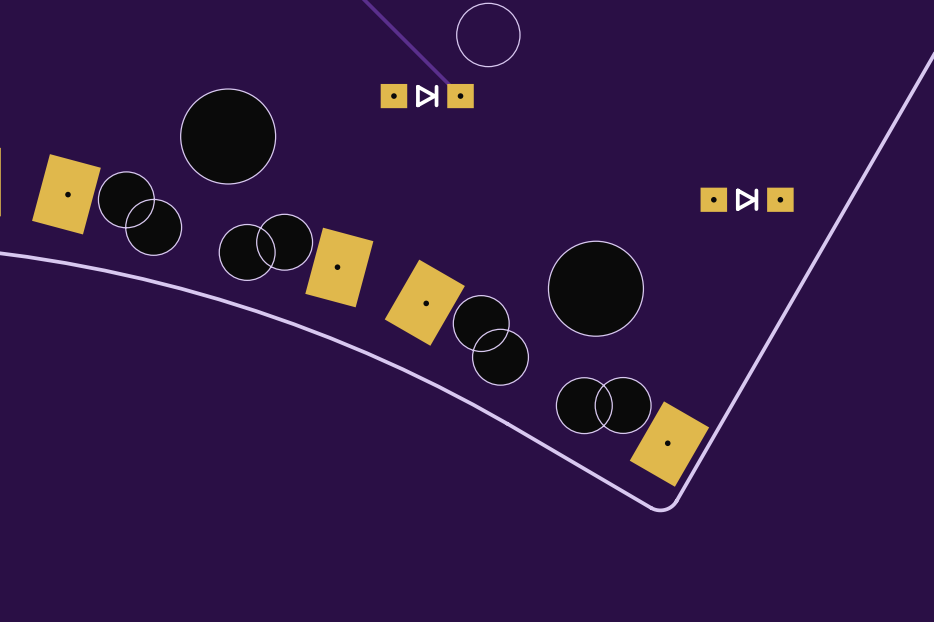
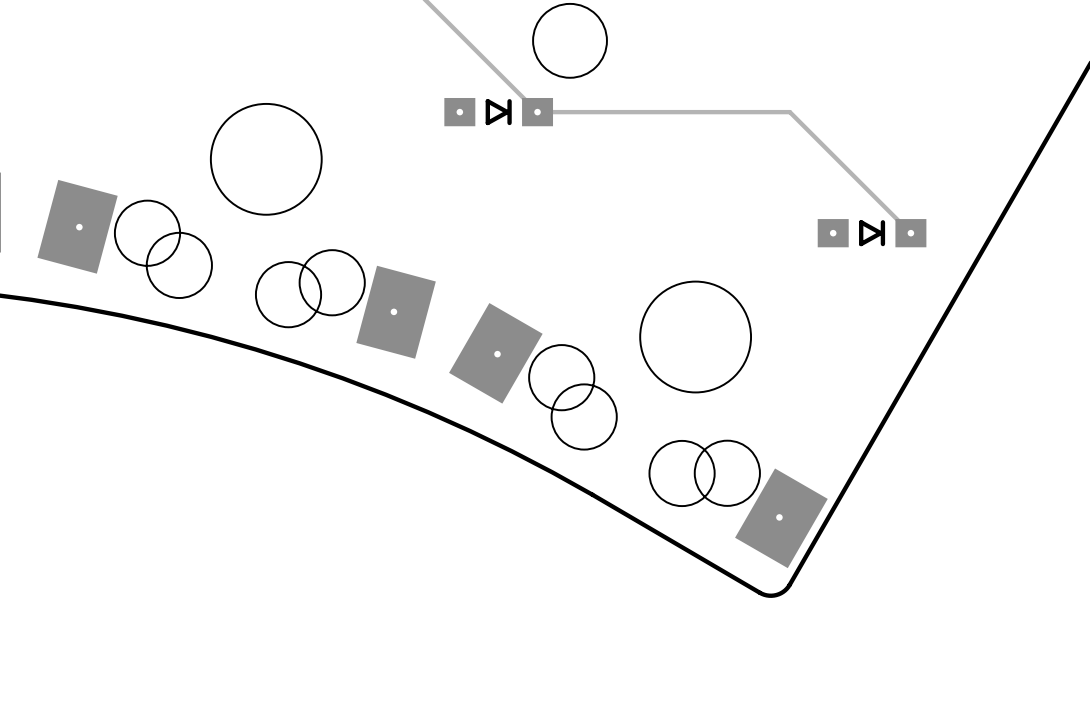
track: none -> (537, 112) (789, 112) (910, 233)

